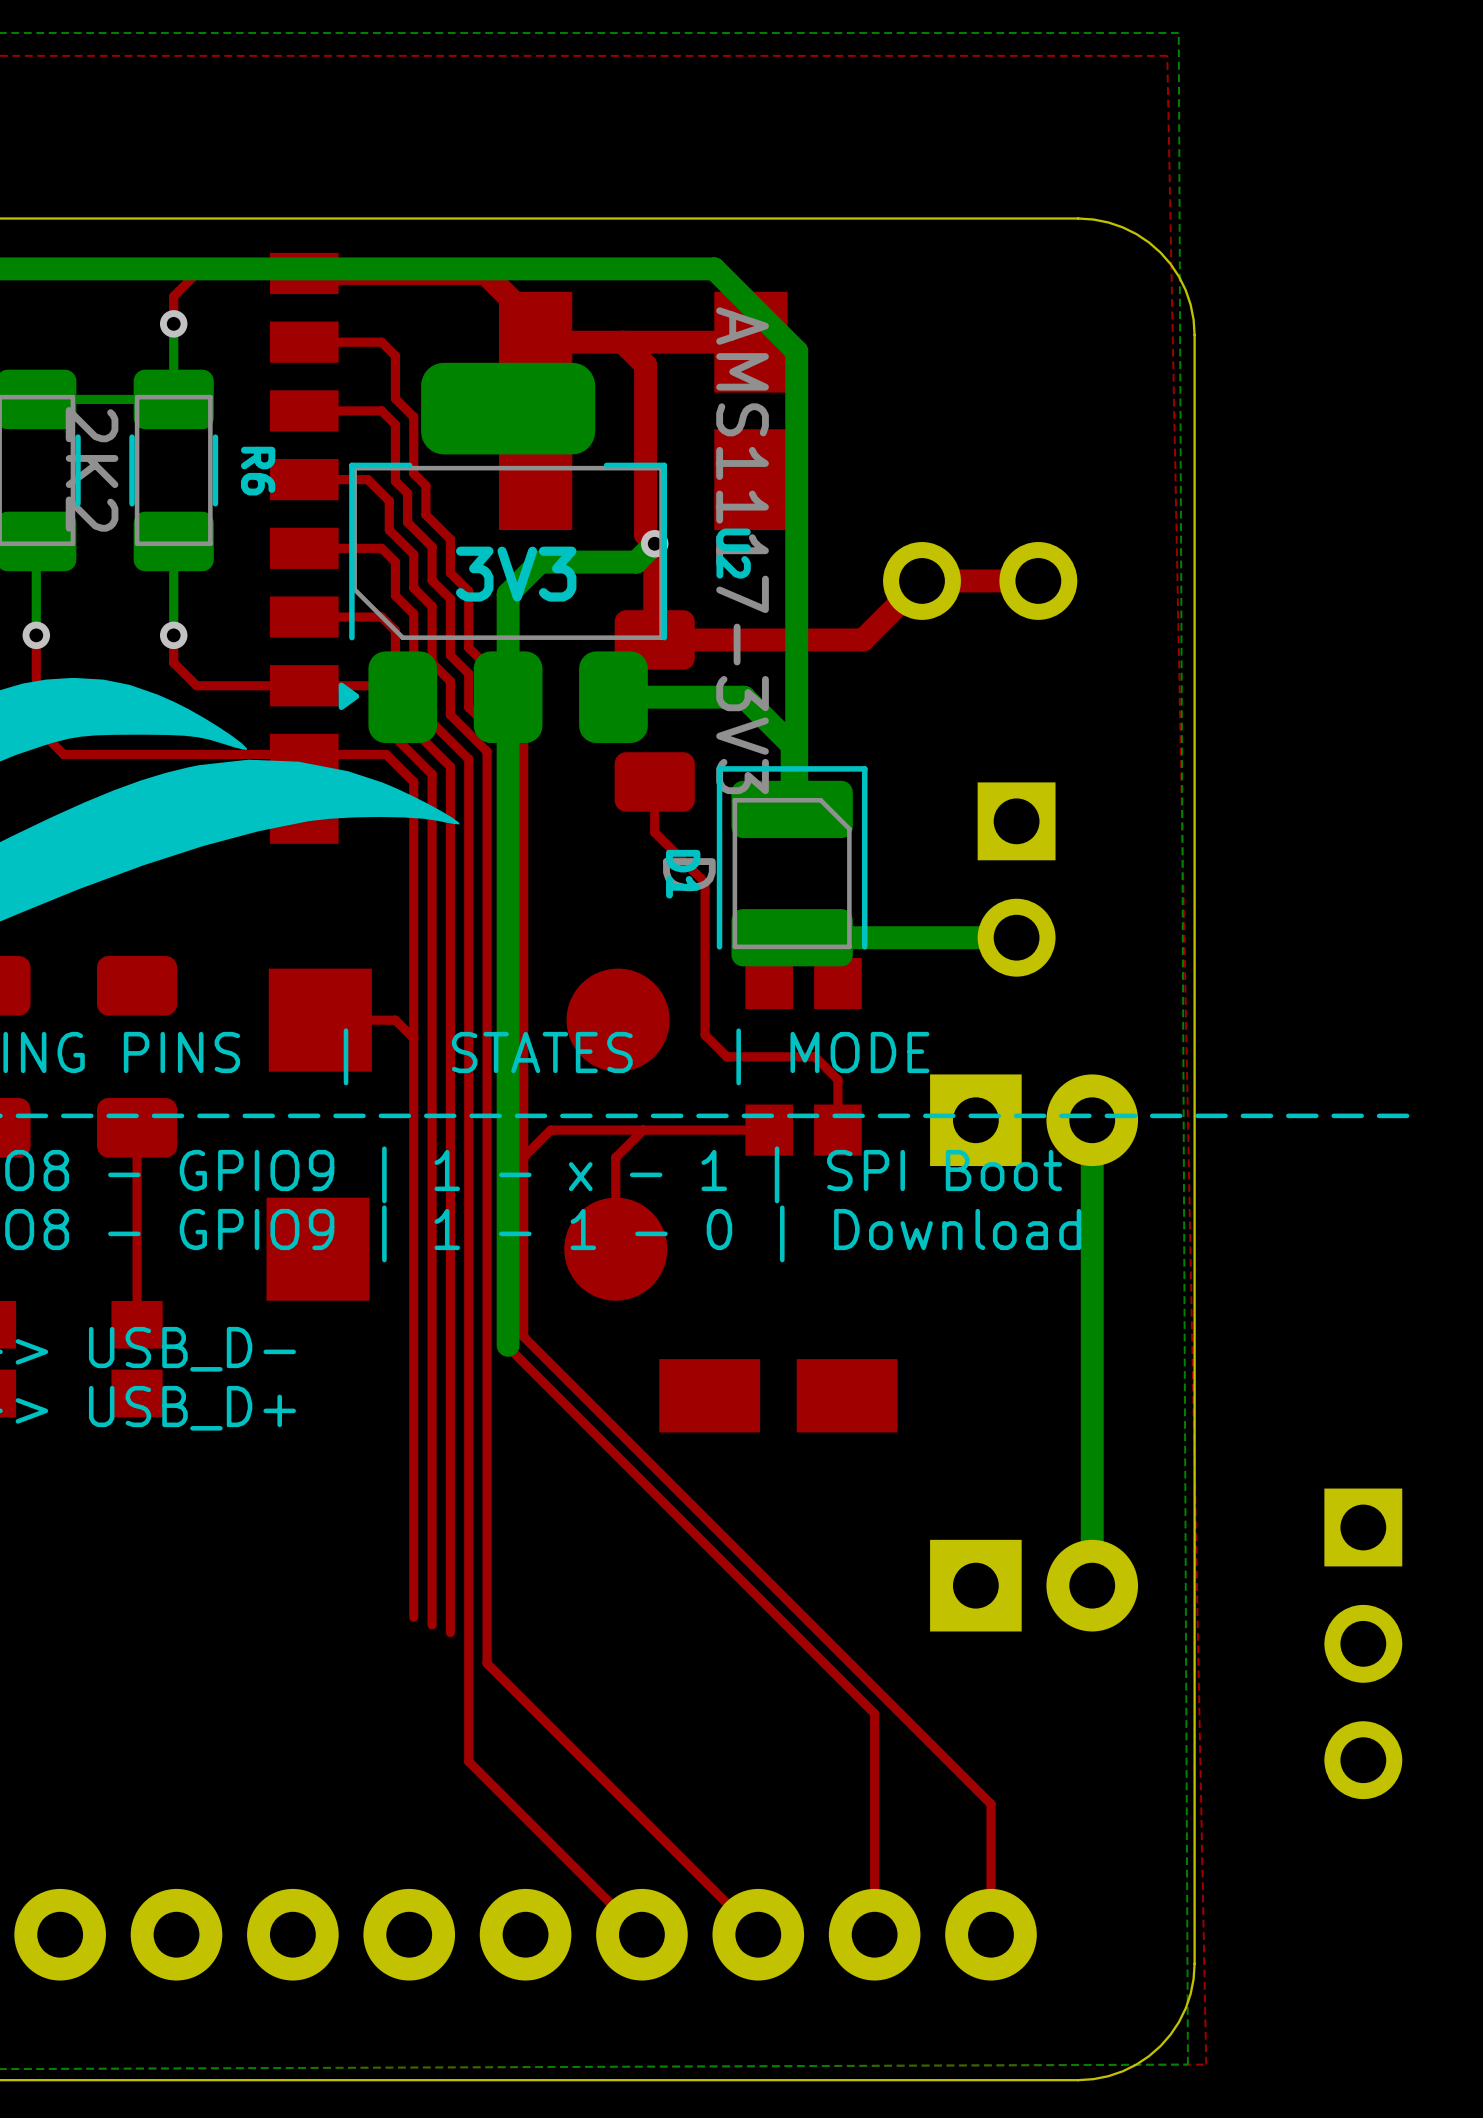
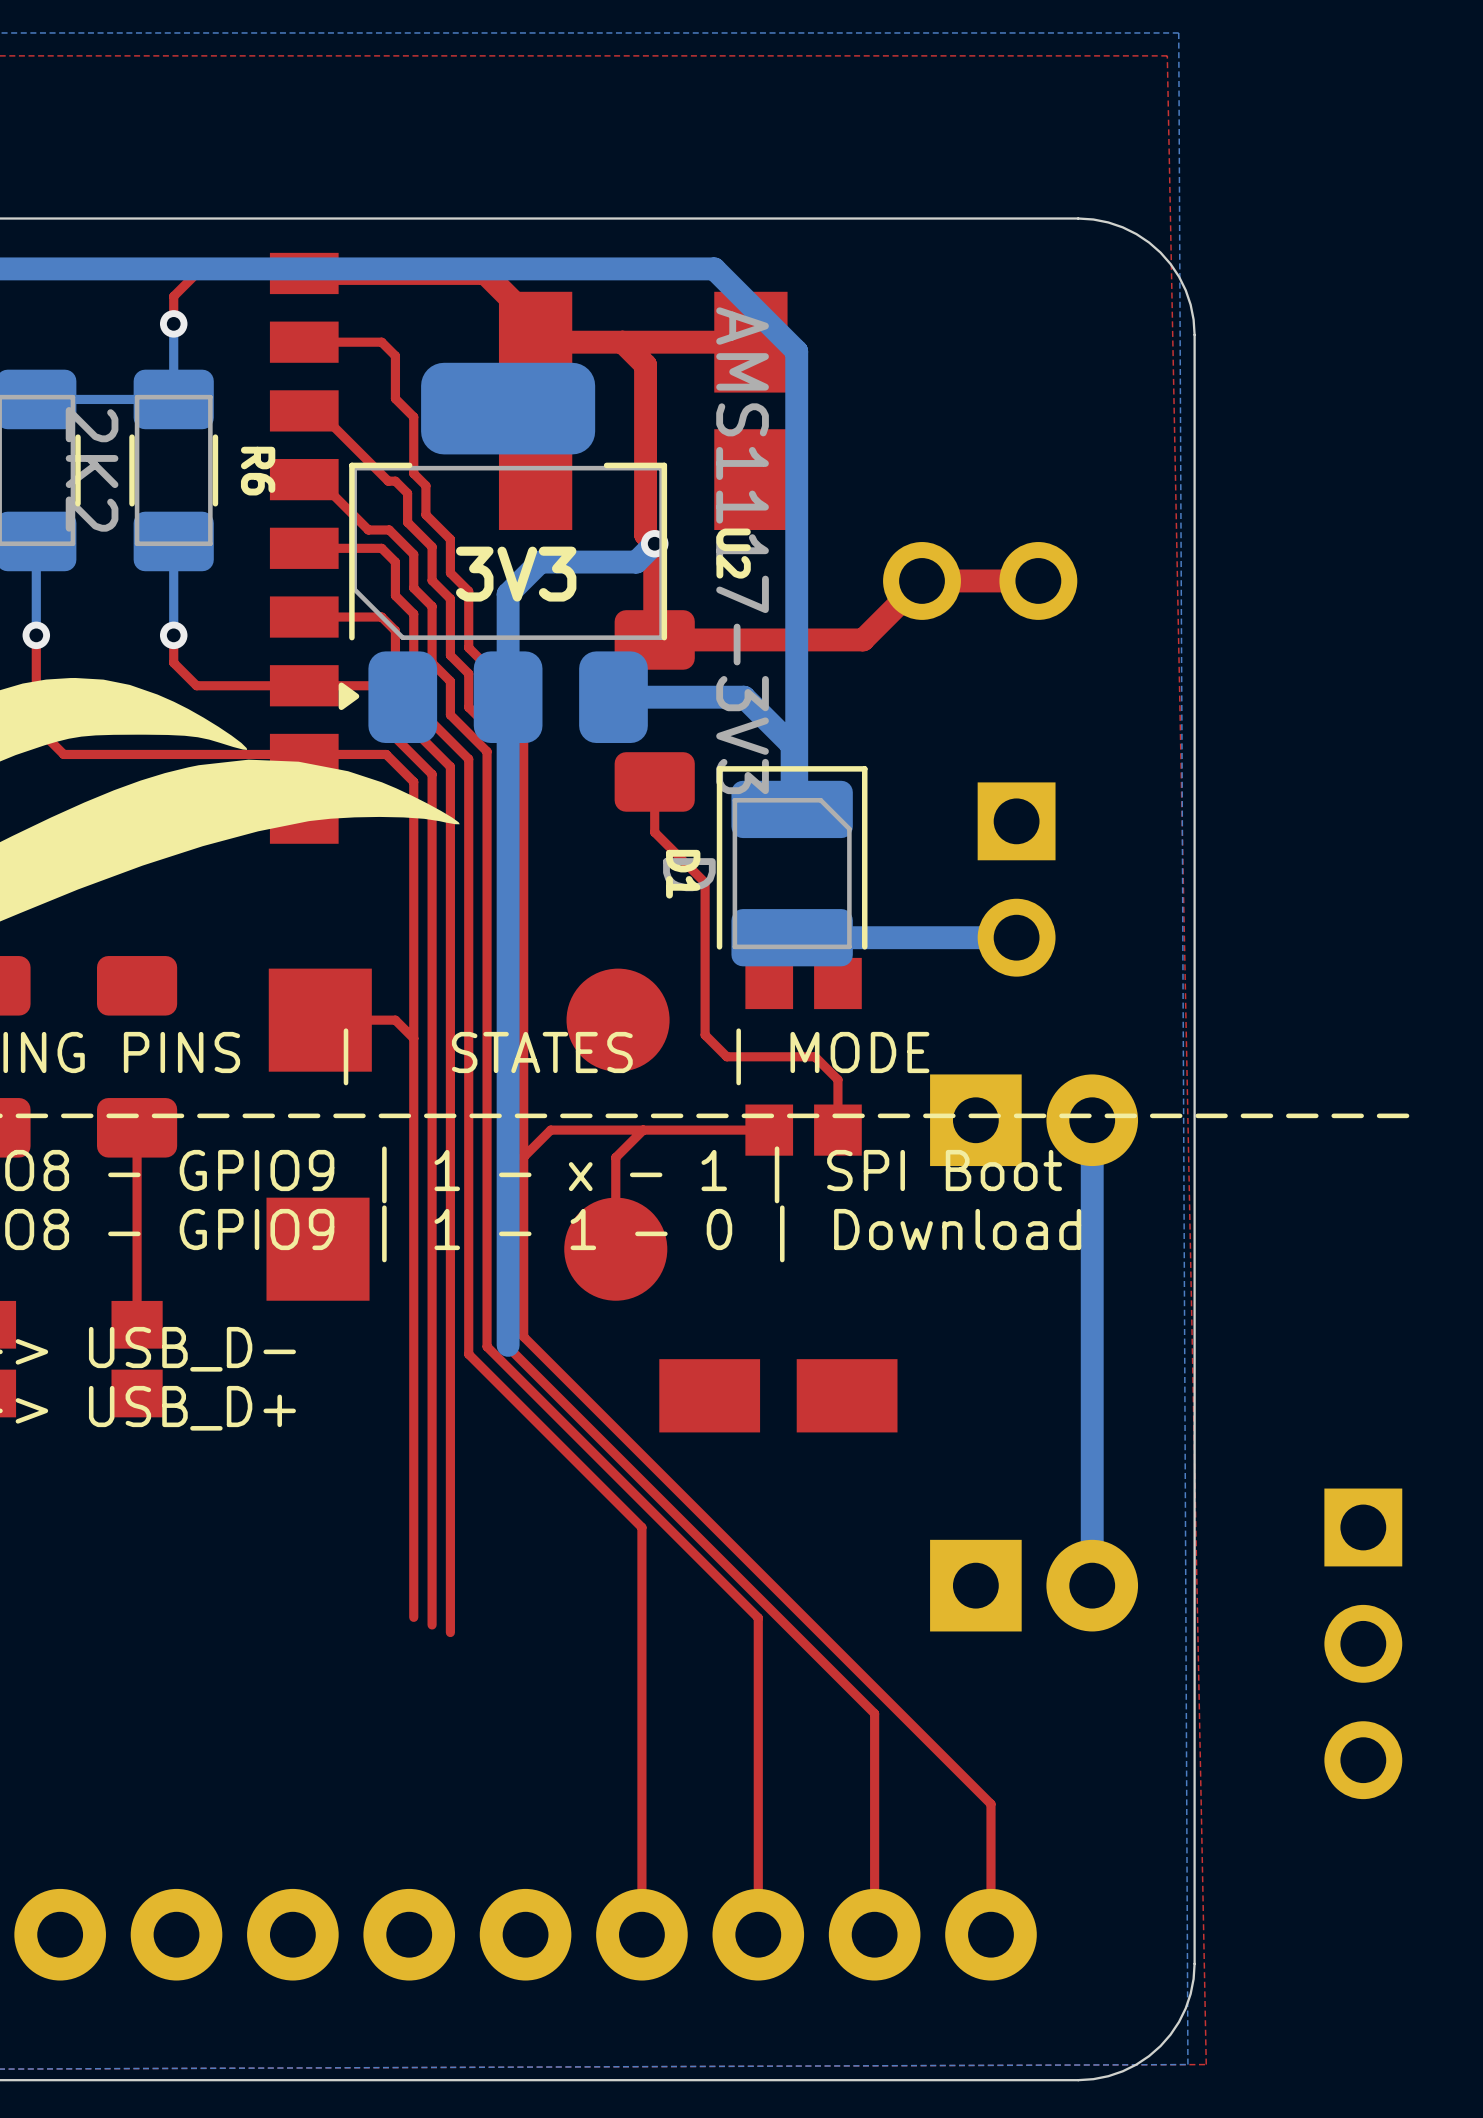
top track: (318, 410) (381, 410) (395, 424) (395, 481) -> (318, 410) (388, 481) (395, 481)
top track: (318, 479) (367, 479) (389, 500) (389, 530) -> (318, 479) (368, 530) (389, 530)
top track: (487, 1346) (487, 1663) (758, 1934) -> (487, 1346) (758, 1617) (758, 1934)
top track: (468, 1354) (468, 1761) (641, 1934) -> (468, 1354) (641, 1527) (641, 1934)

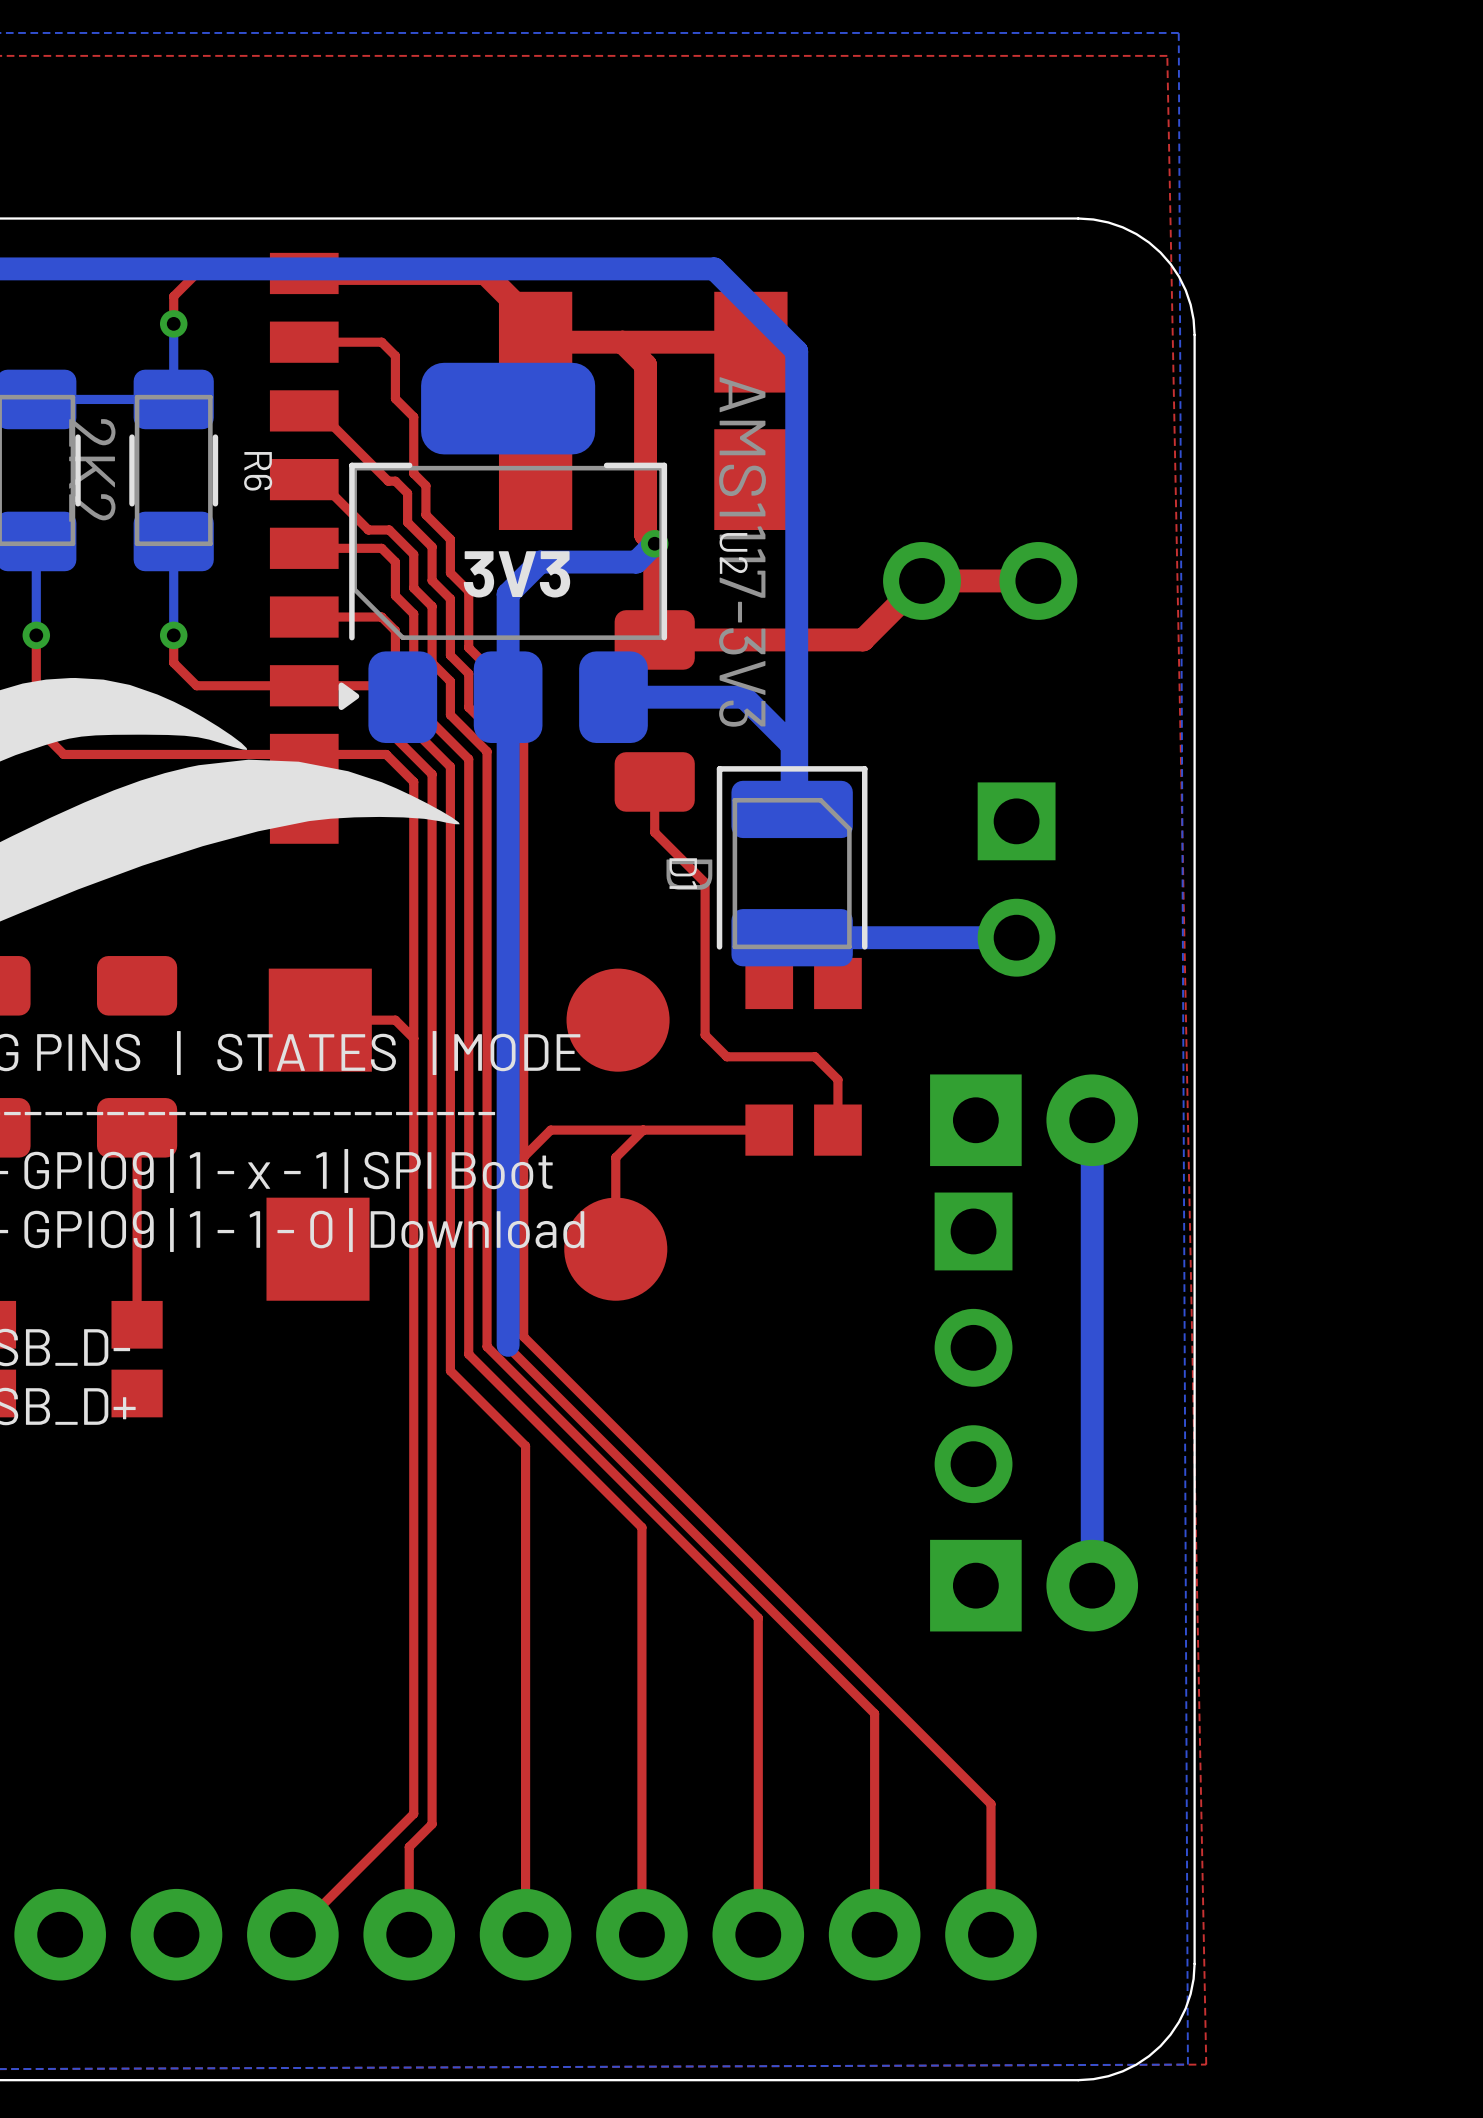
top track: (450, 1370) (450, 1632) -> (450, 1370) (525, 1446) (525, 1934)
part: (778, 1395) -> none
top track: none -> (413, 1617) (413, 1813) (292, 1934)
top track: none -> (432, 1624) (432, 1824) (409, 1847) (409, 1934)
part position: (1363, 1643) -> (973, 1347)

